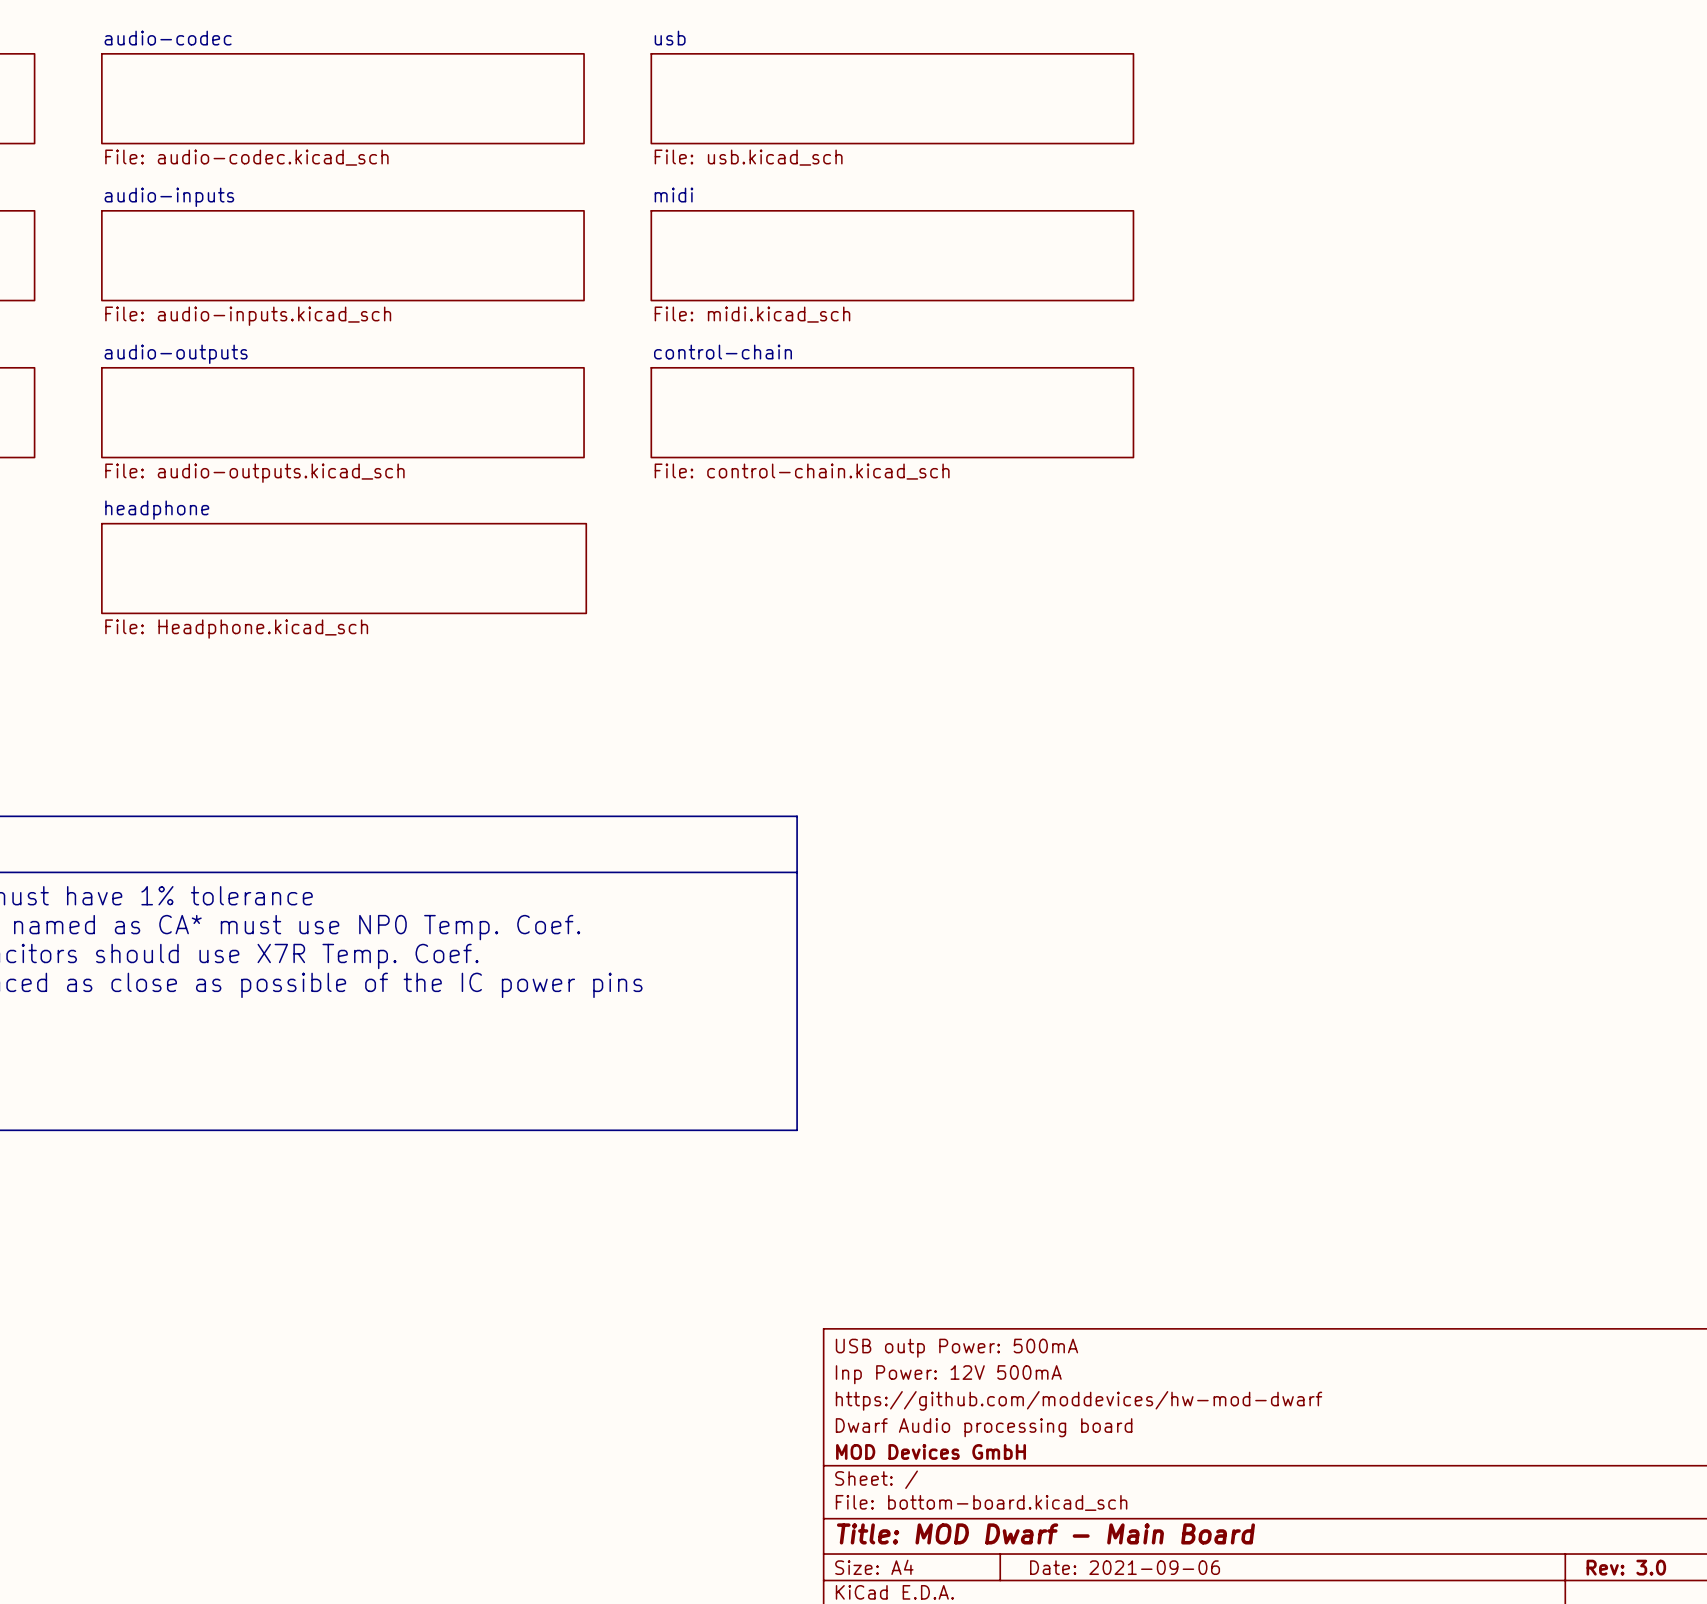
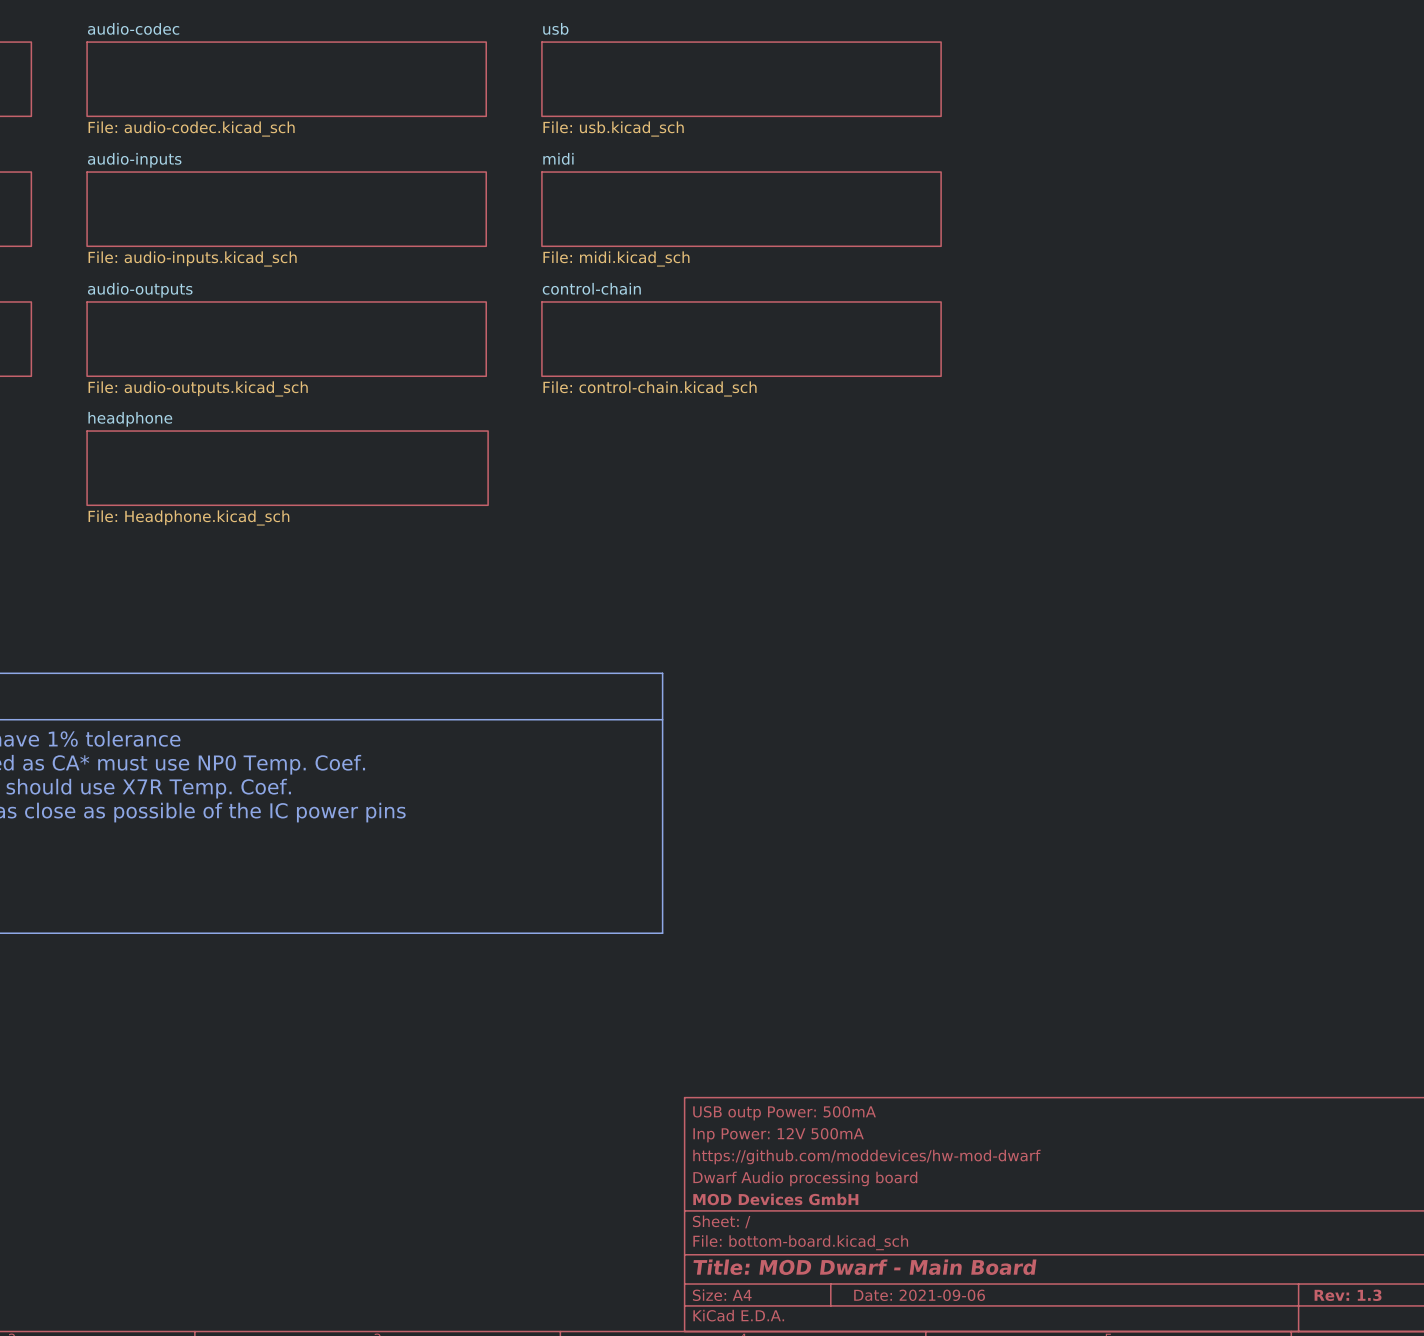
title block: Rev: 3.0 (1626, 1567) -> Rev: 1.3 (1348, 1295)

